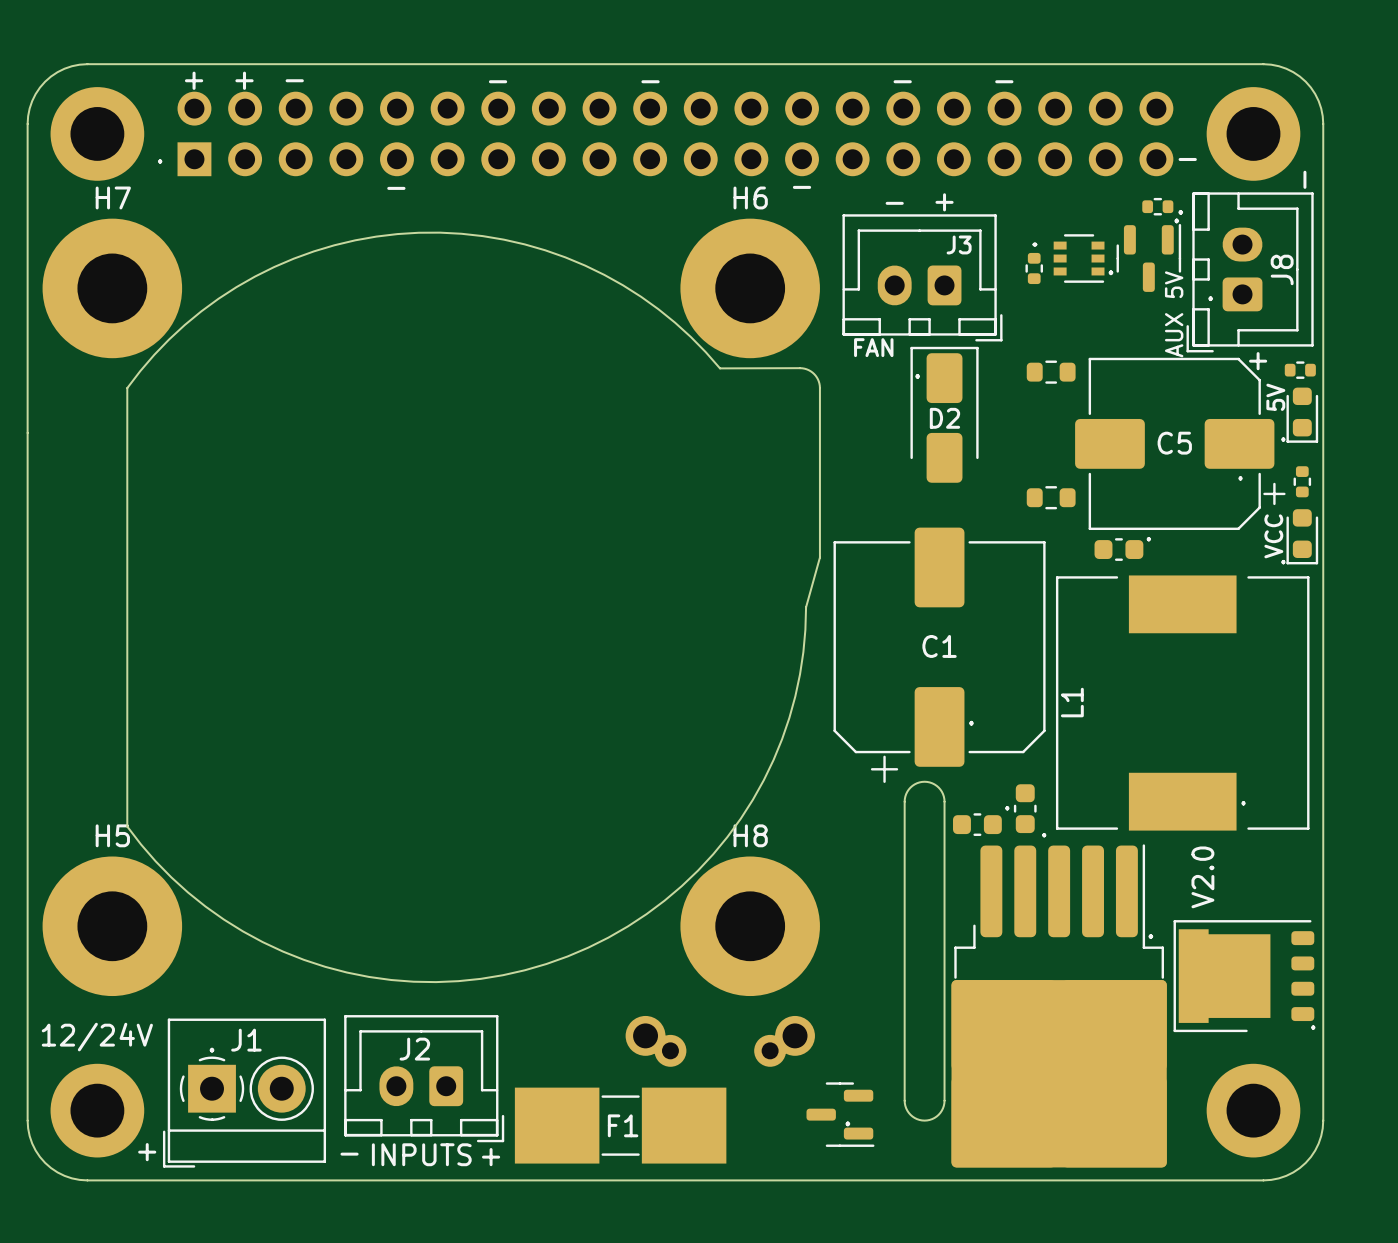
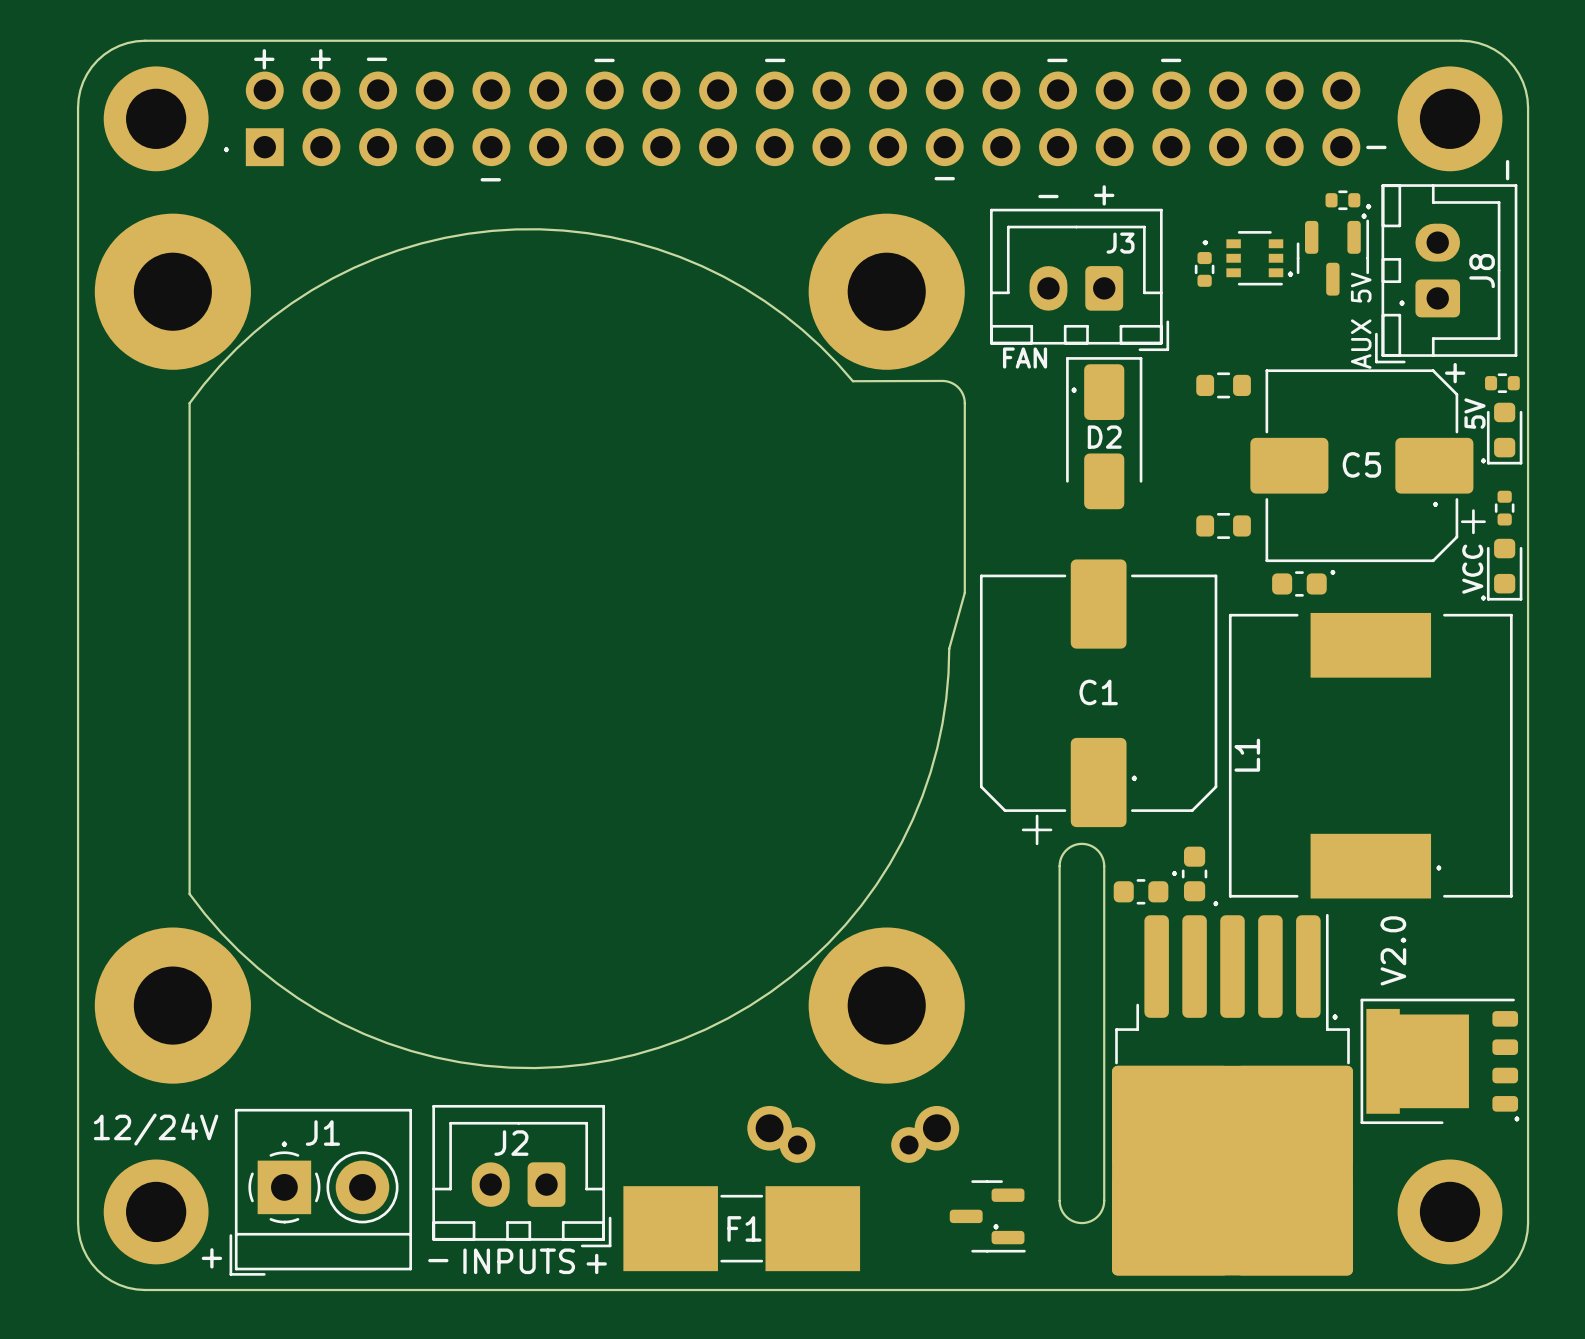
H7 name: H7 (113, 197) -> none
H6 name: H6 (750, 197) -> none
H5 name: H5 (112, 835) -> none
H8 name: H8 (750, 835) -> none

